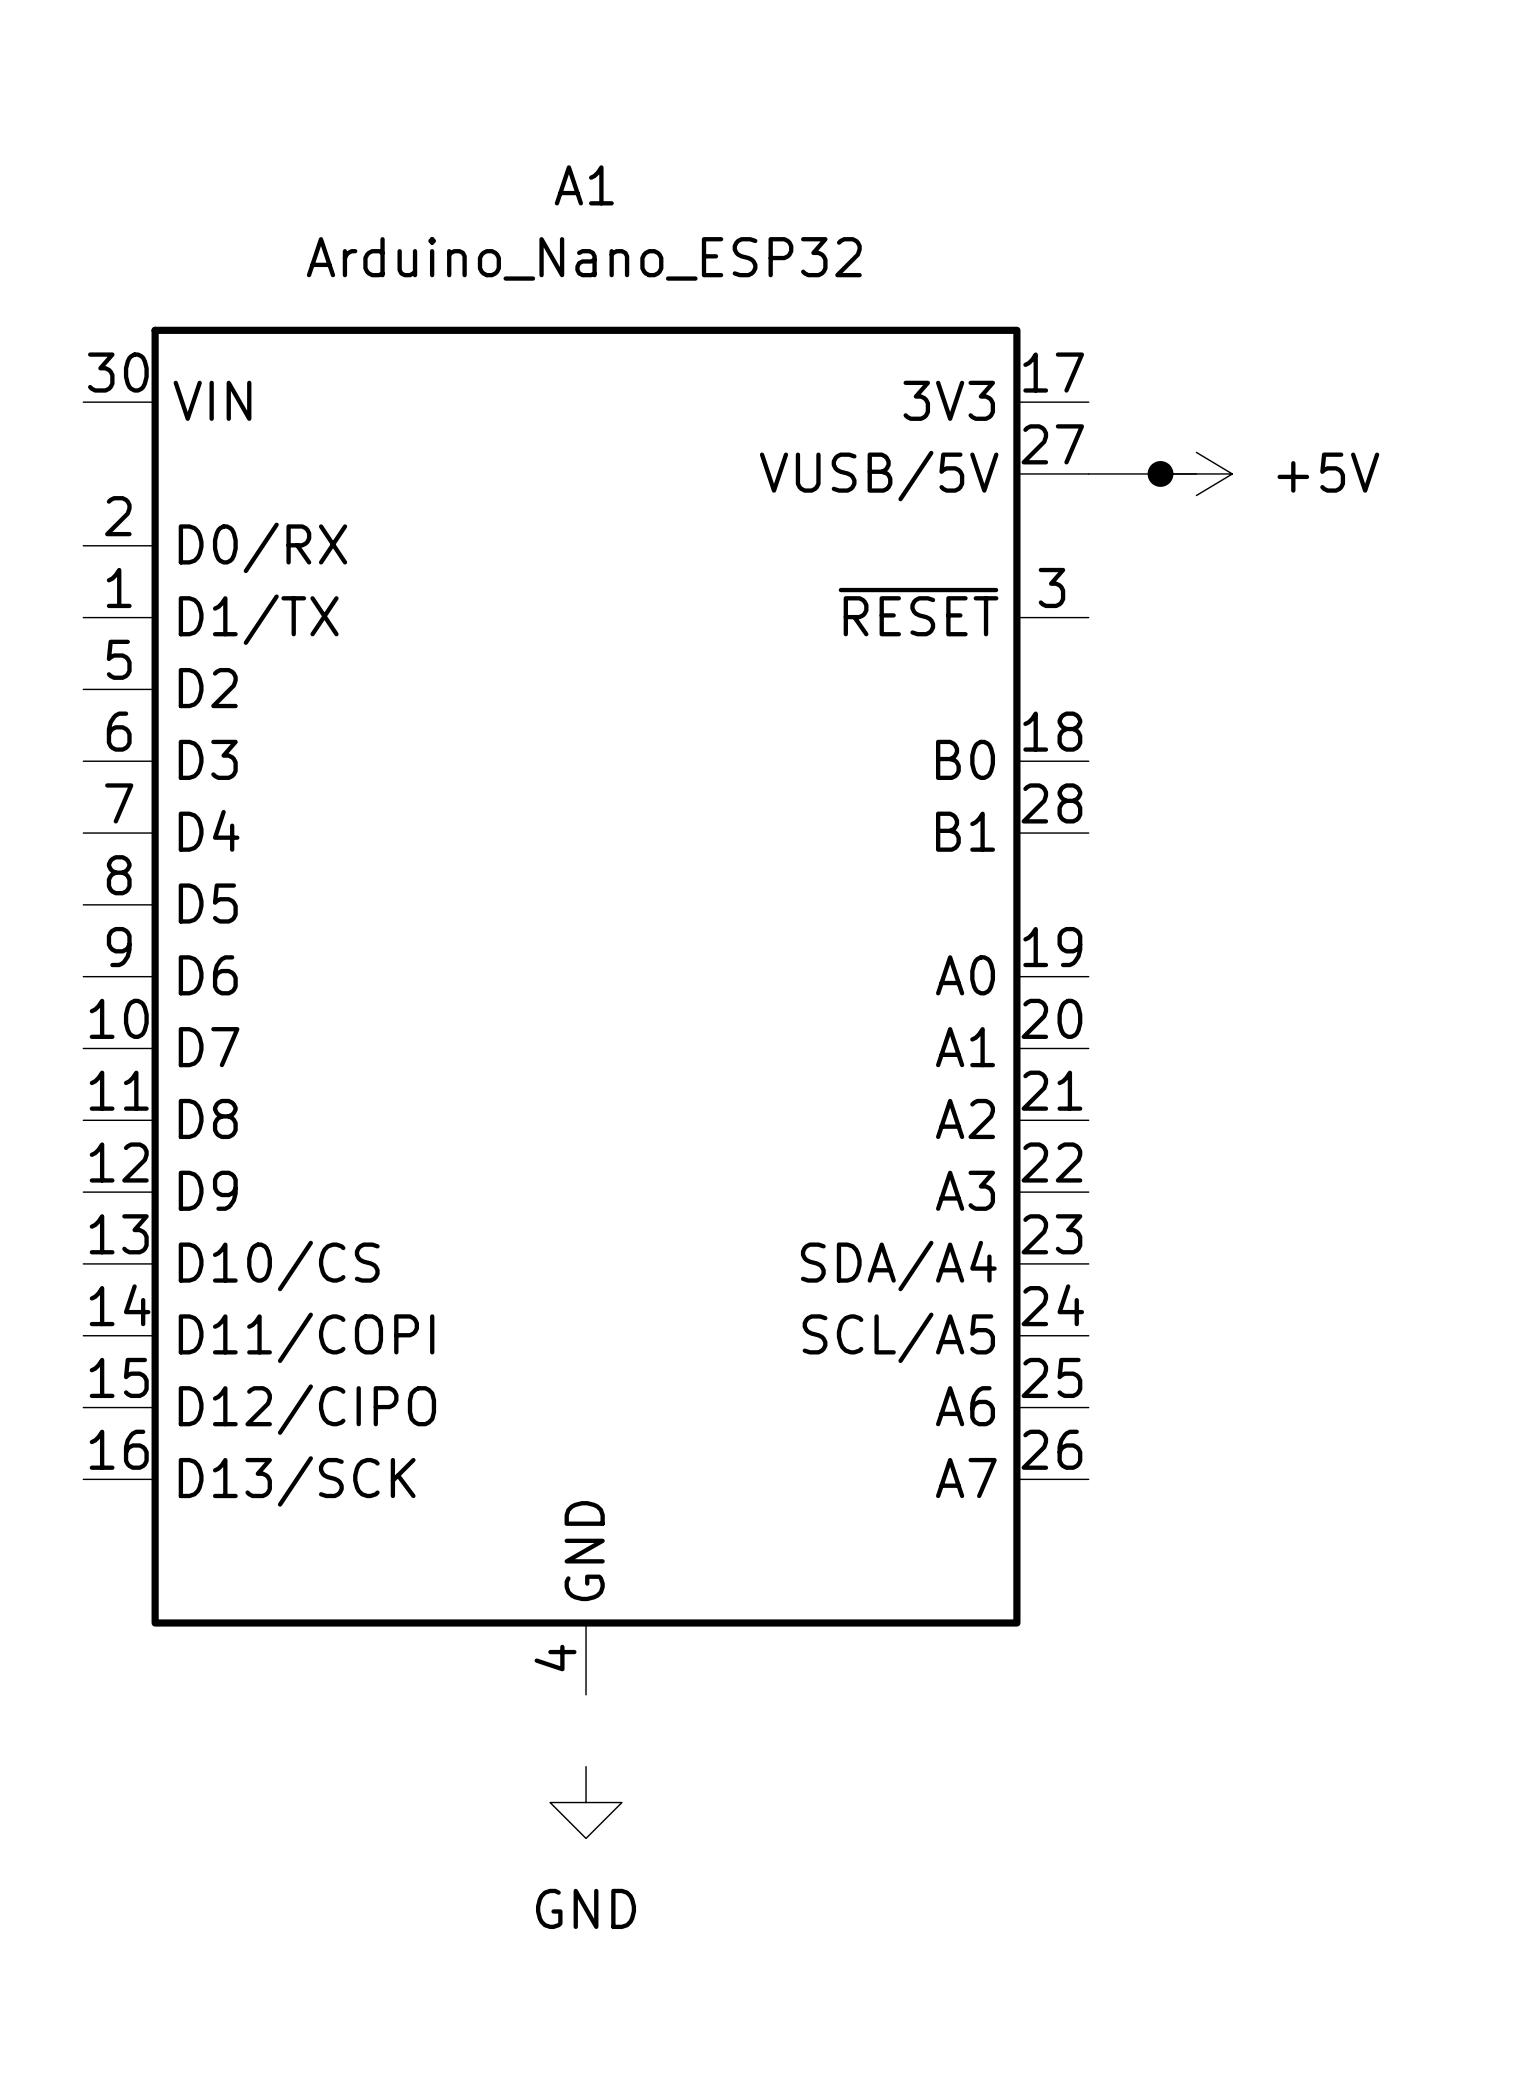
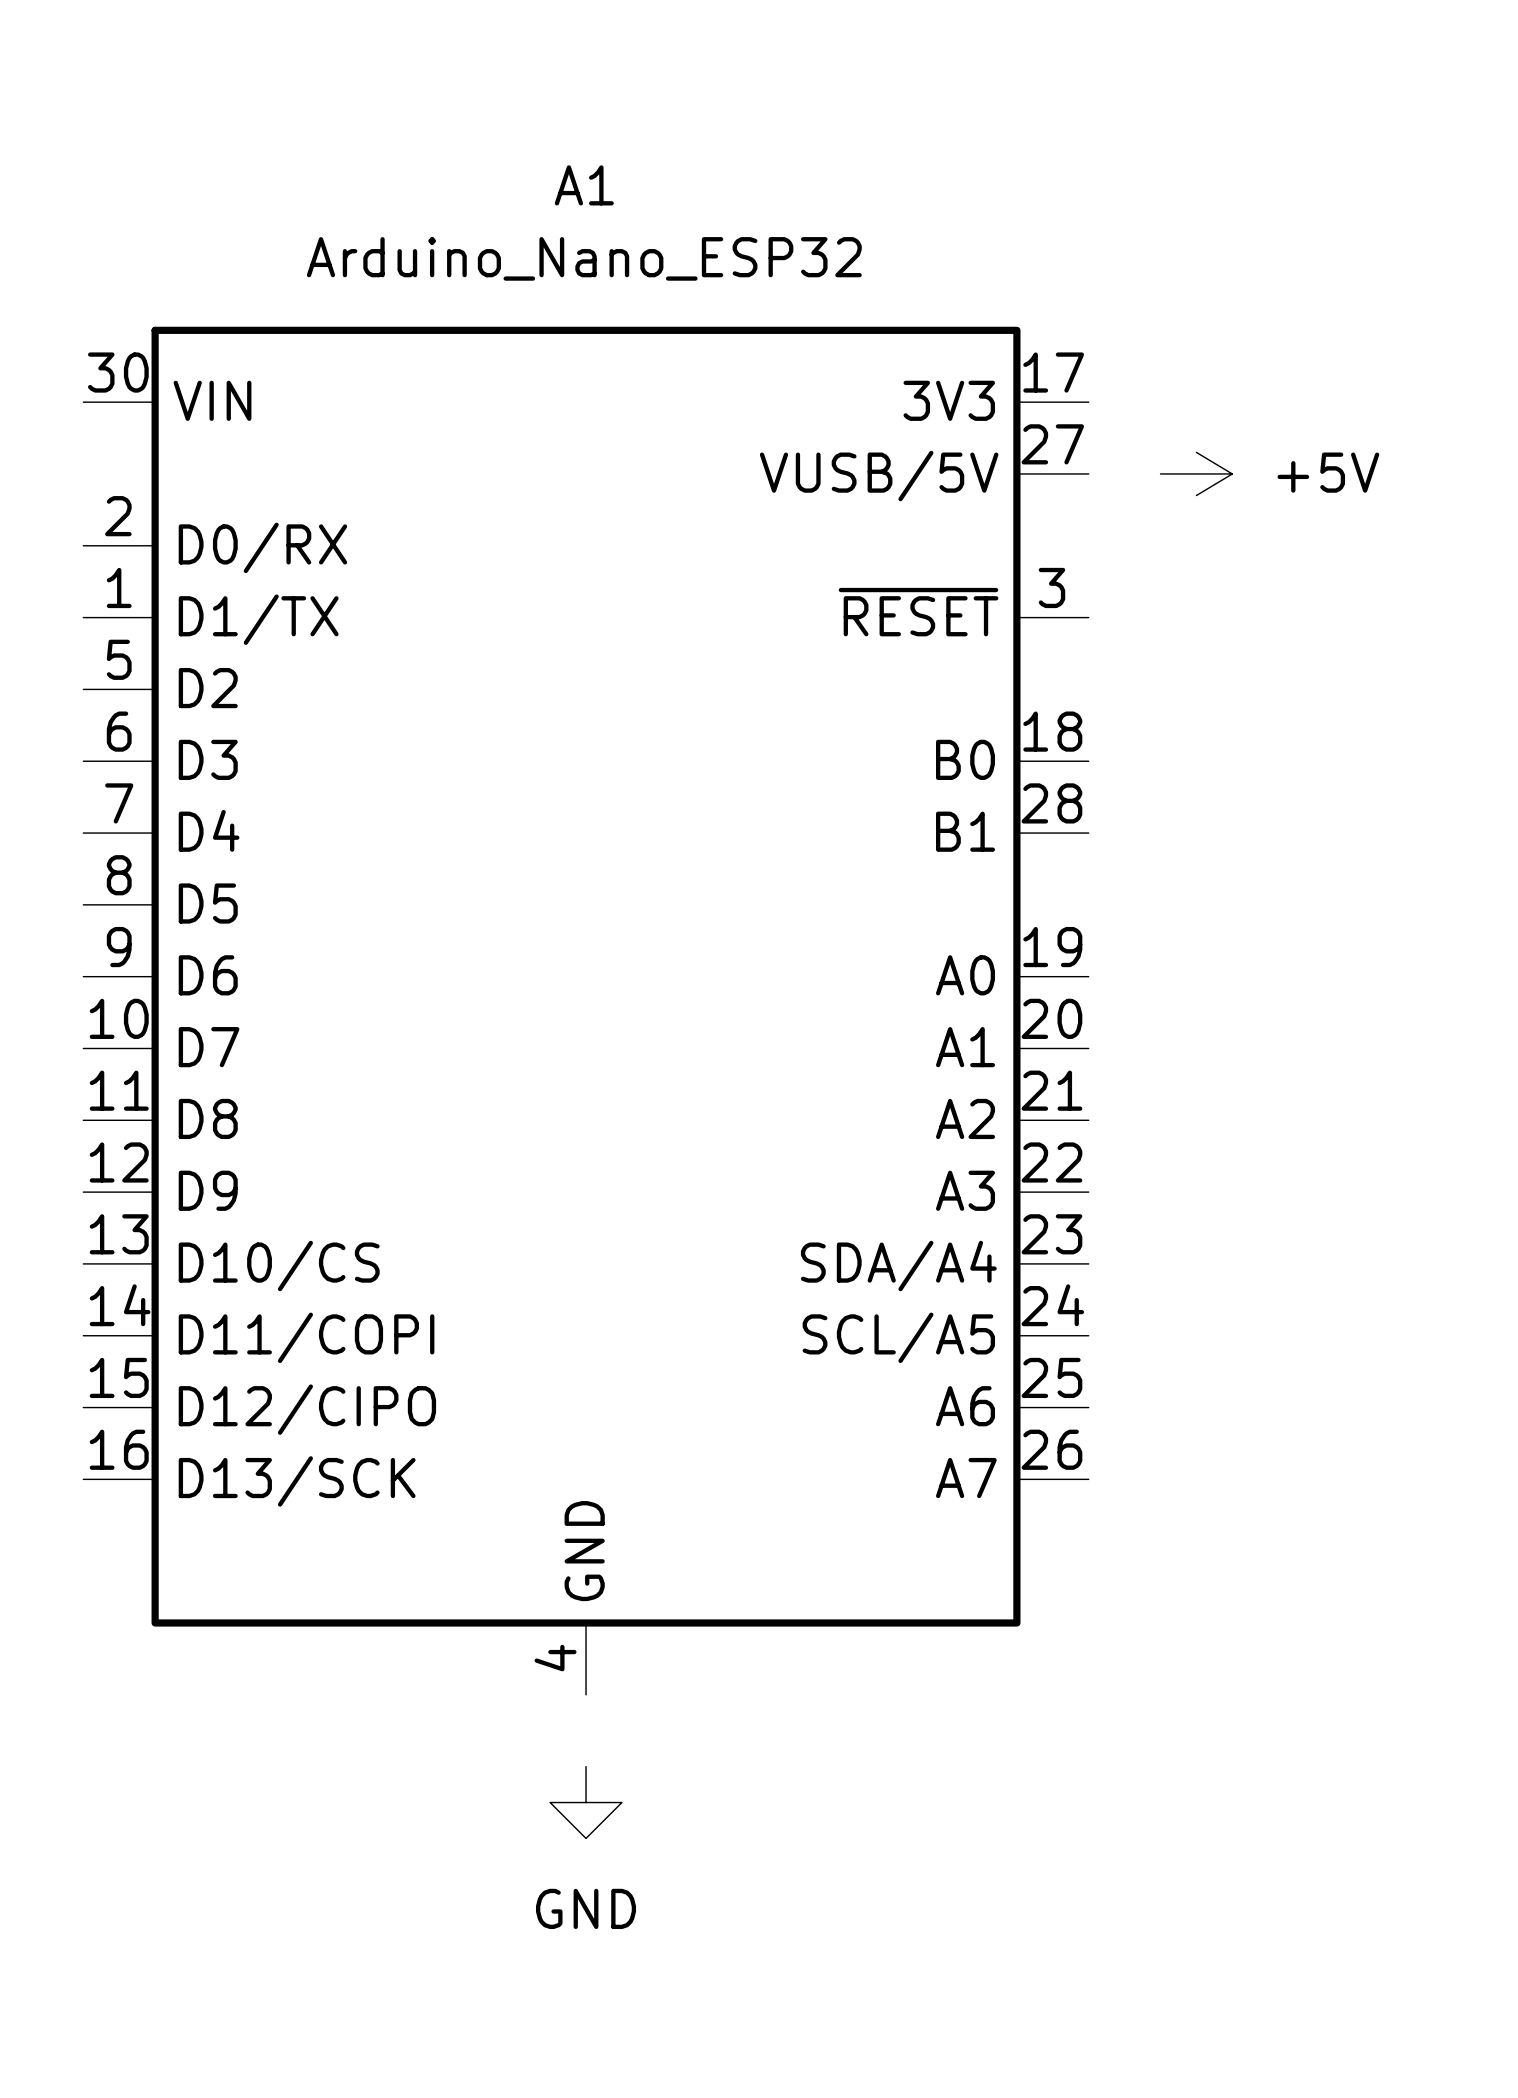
wire: (1088, 473) (1196, 473) -> none
junction: (1160, 473) -> none

